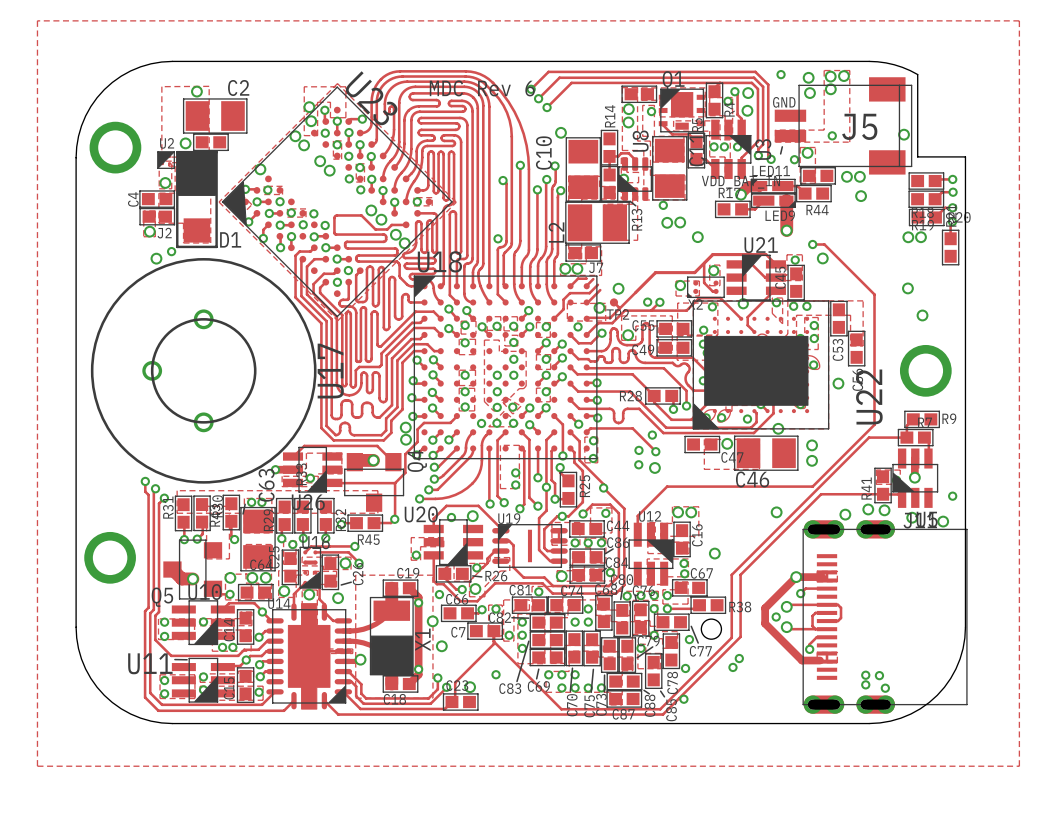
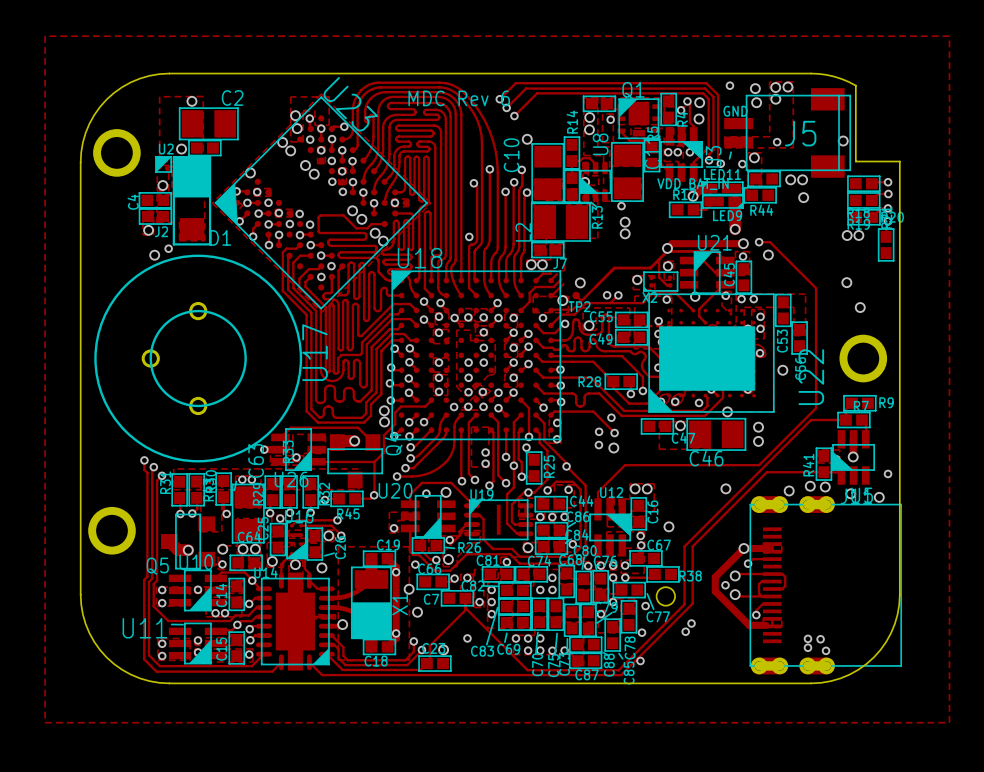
via: (680, 222) -> none
via: none -> (625, 233)
via: (697, 237) -> none
track: none -> (743, 243) (672, 243) (667, 248)
via: none -> (743, 243)
via: none -> (667, 248)

